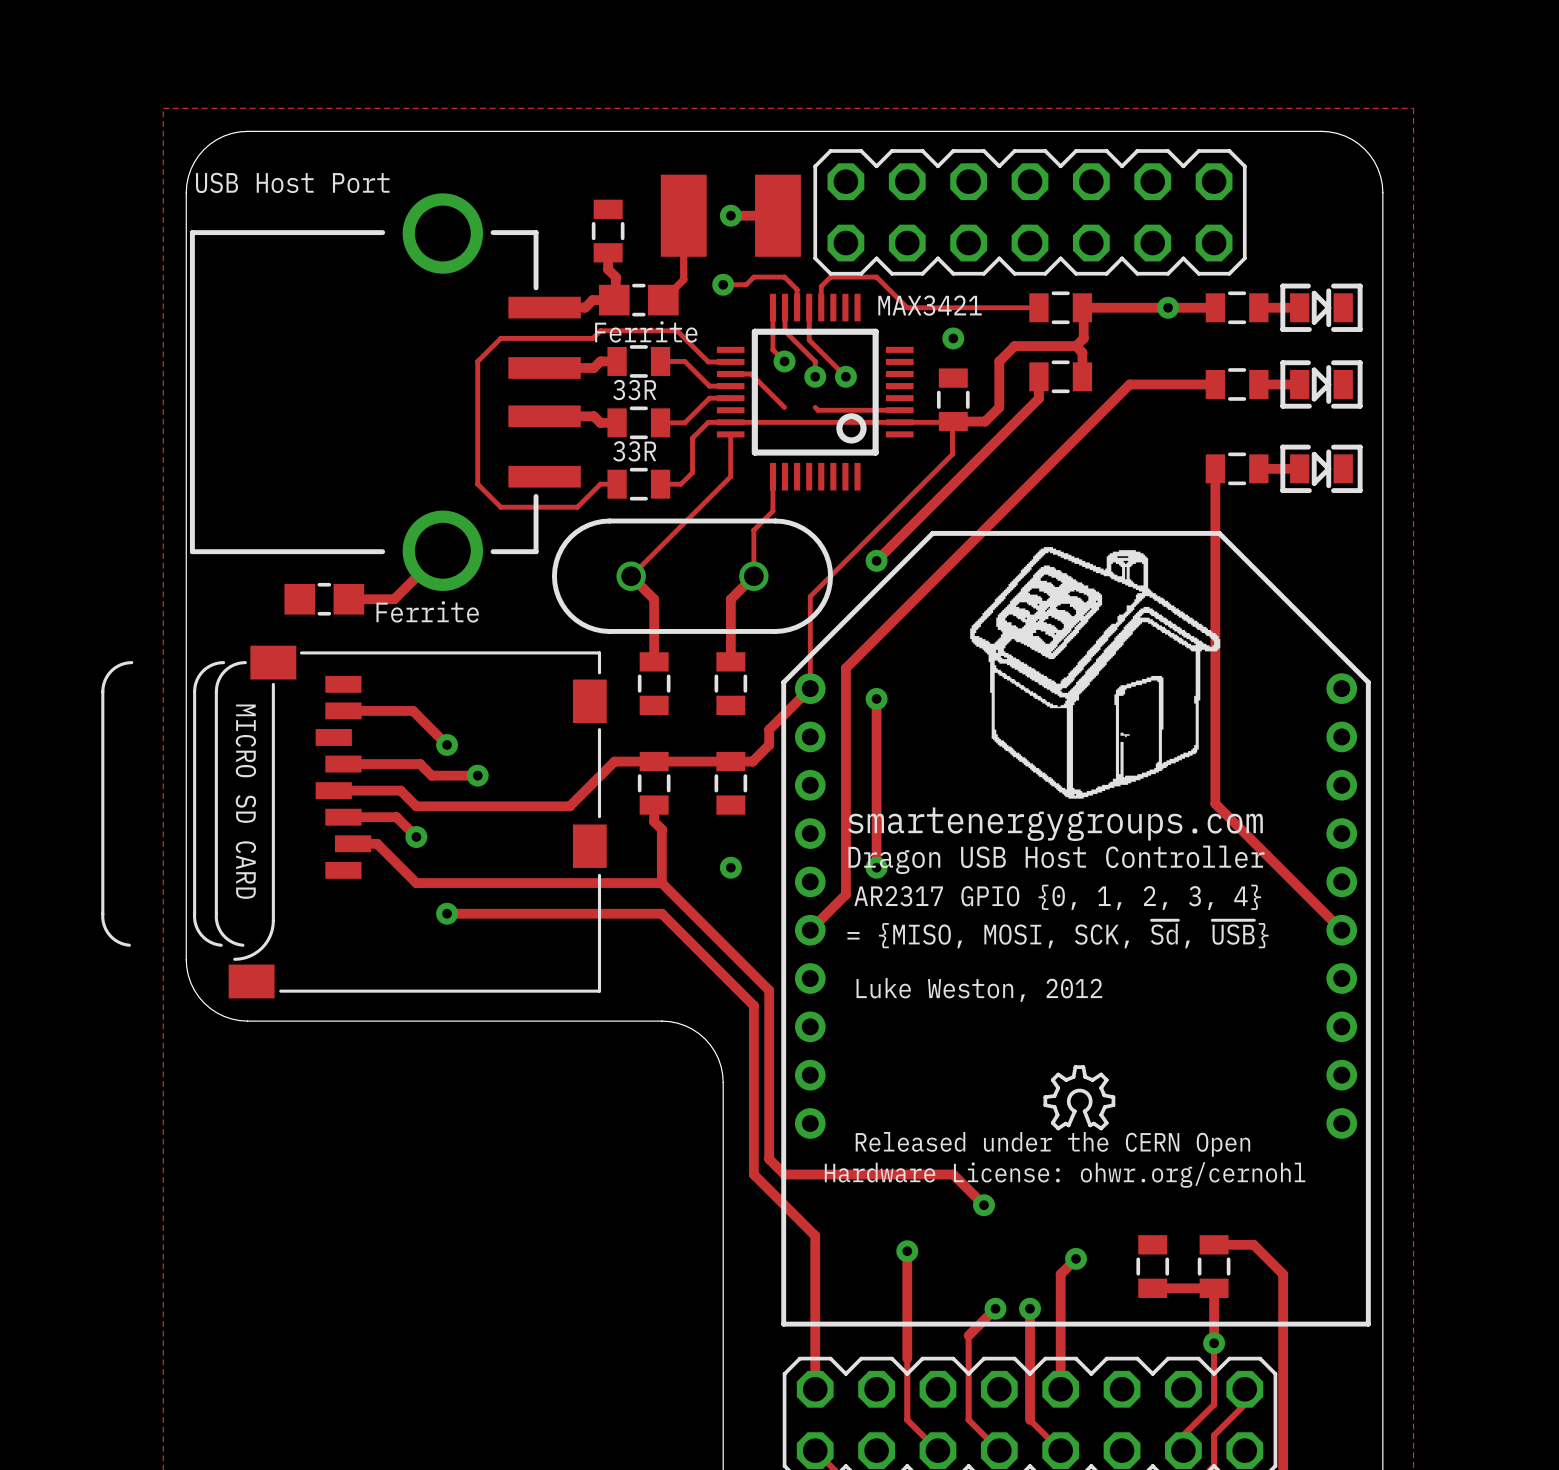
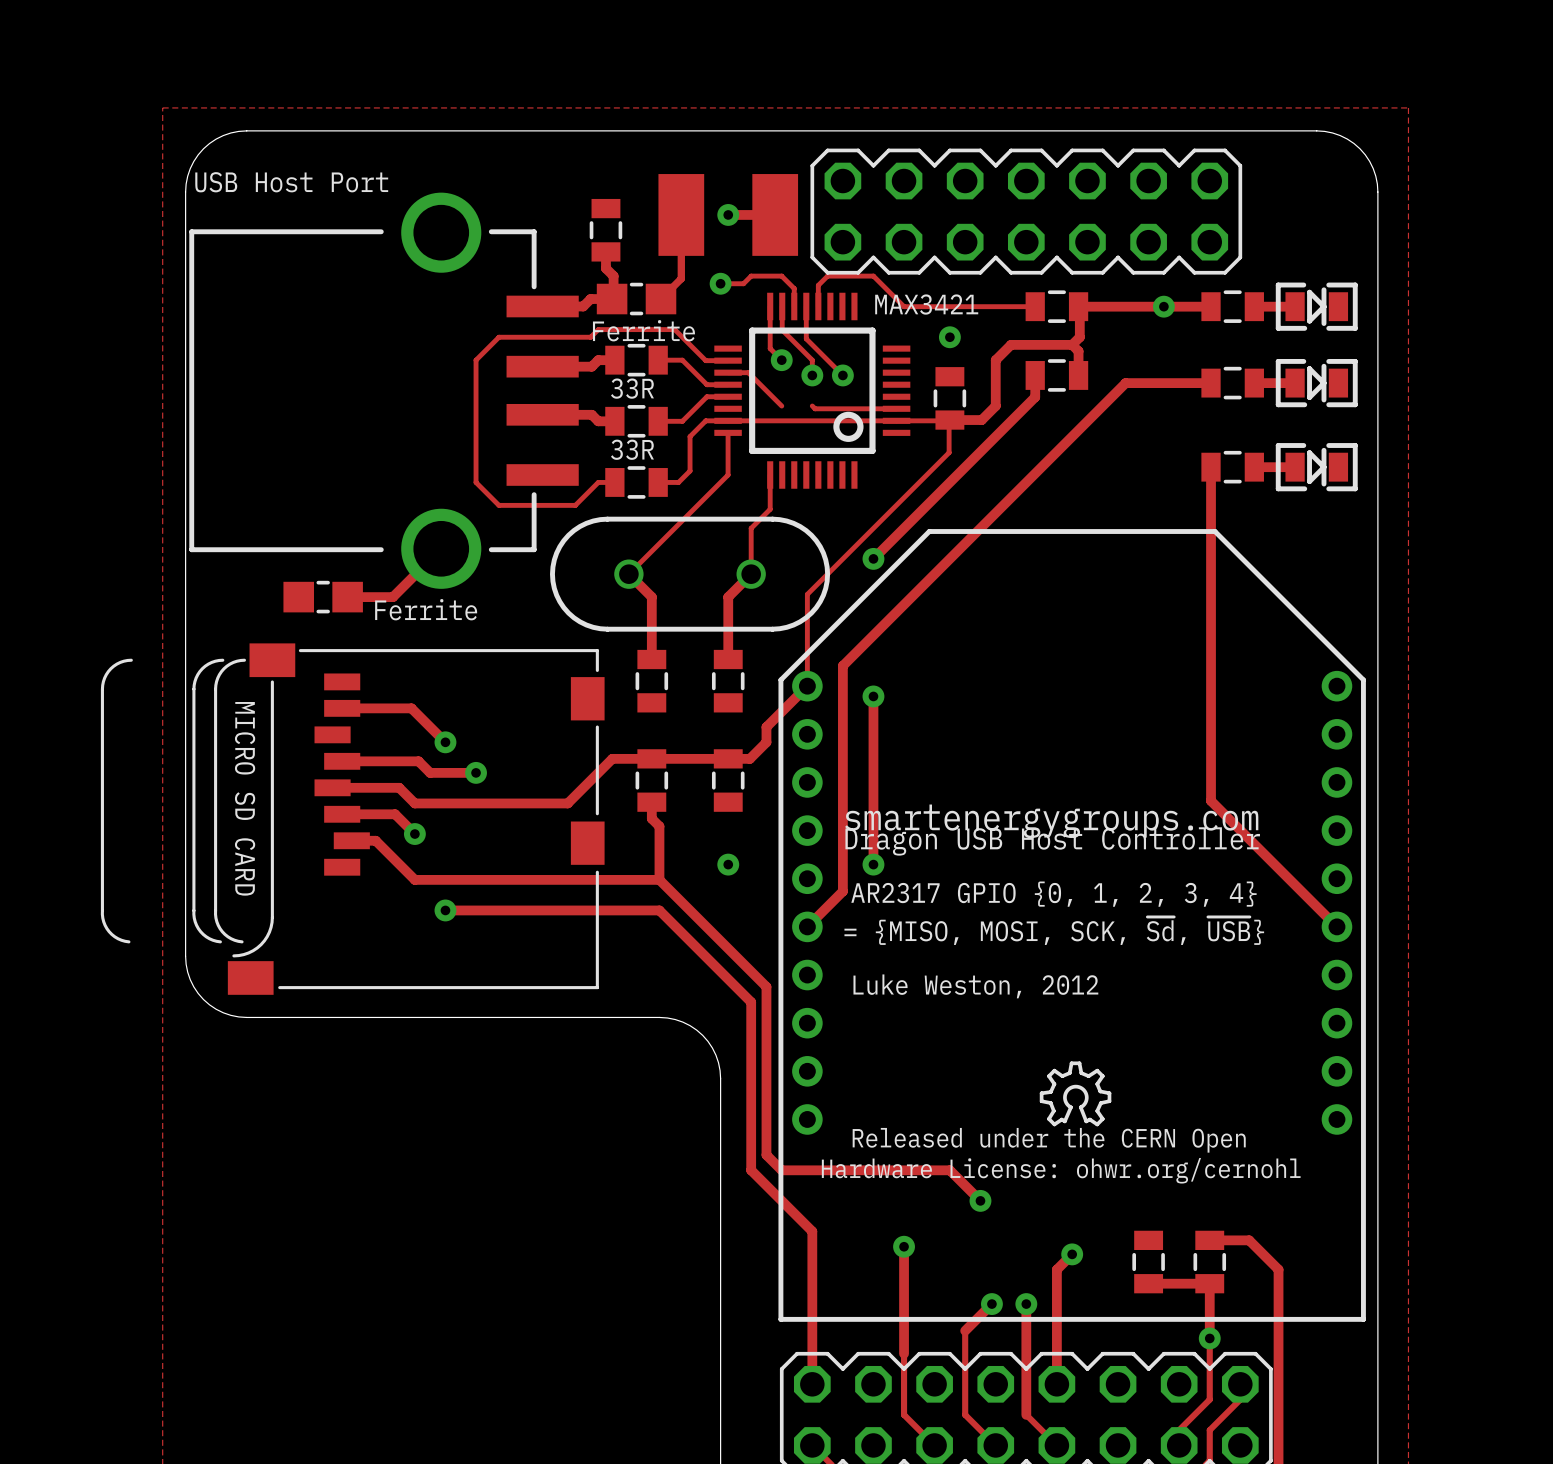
drawing: [970, 547, 1221, 799] -> none
text position: Dragon USB Host Controller (1056, 859) -> Dragon USB Host Controller (1052, 841)

